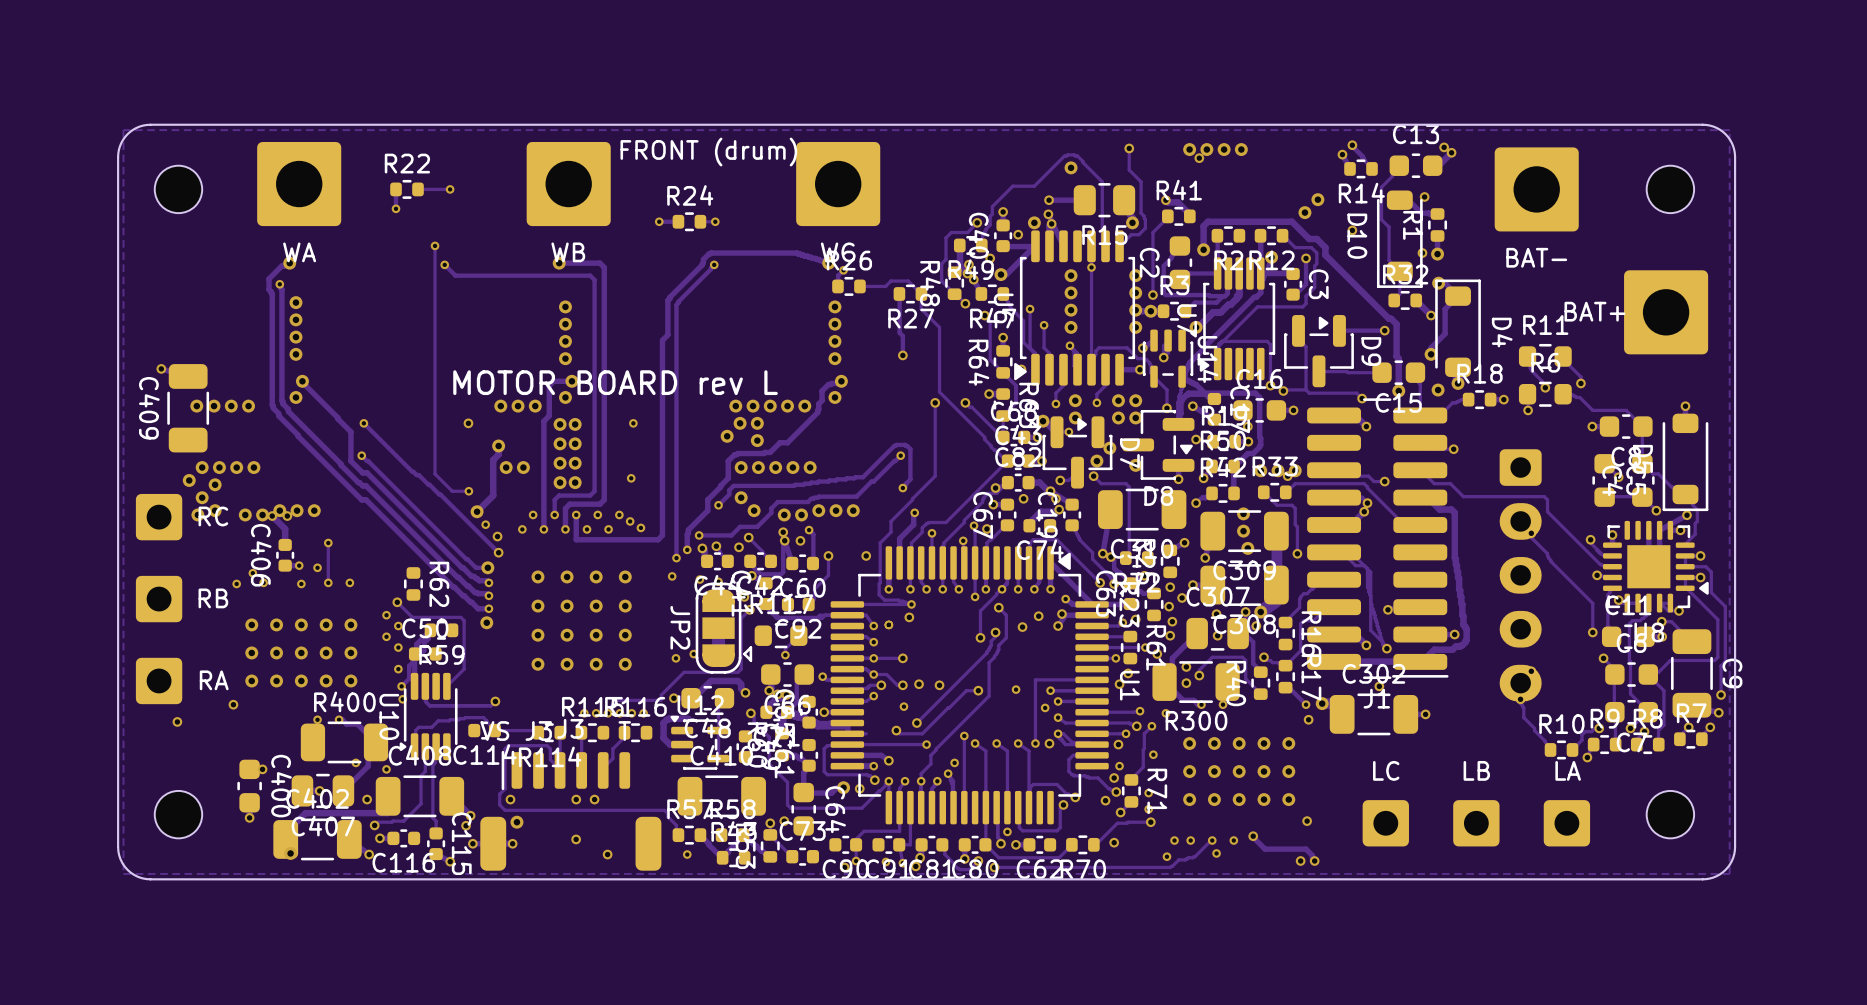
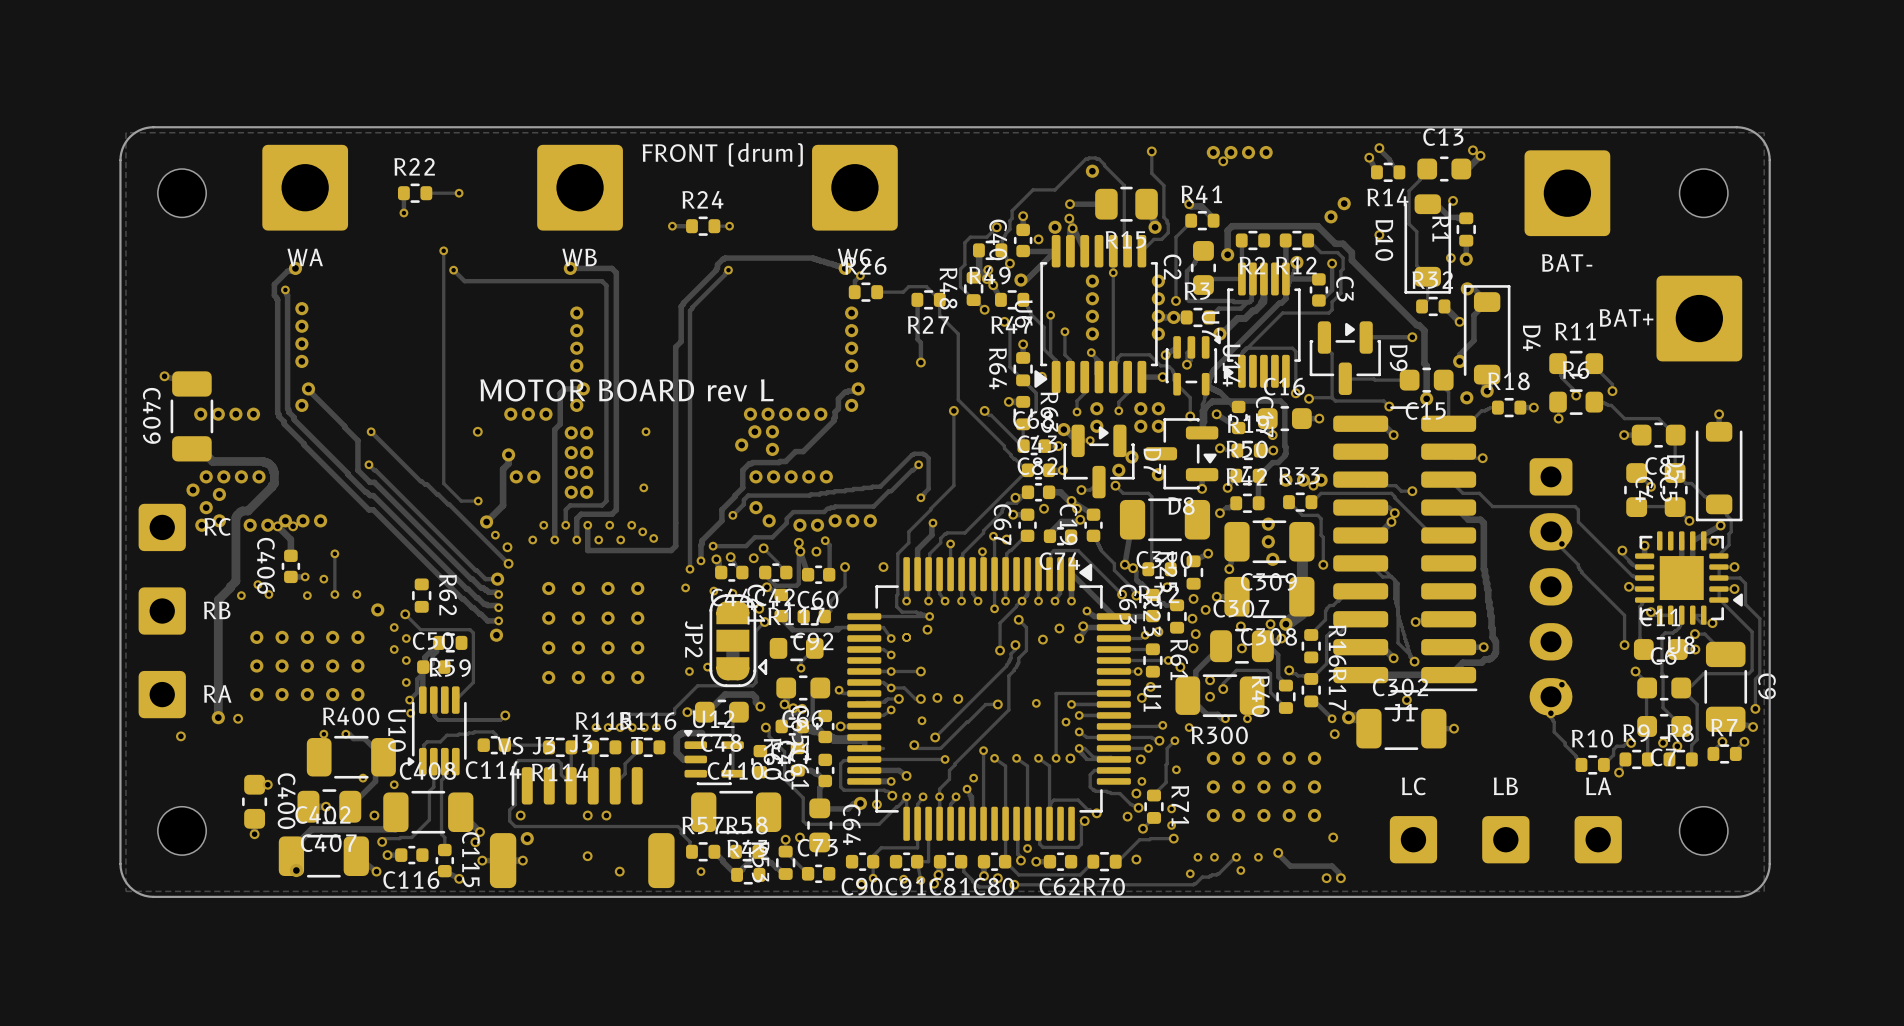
track: none -> (191, 448) (201, 450) (212, 461) (263, 461) (268, 463) (274, 472) (274, 483) (272, 486) (248, 510) (240, 512) (235, 517) (235, 581) (218, 600) (218, 717)
via: none -> (377, 609)
via: none -> (218, 717)

